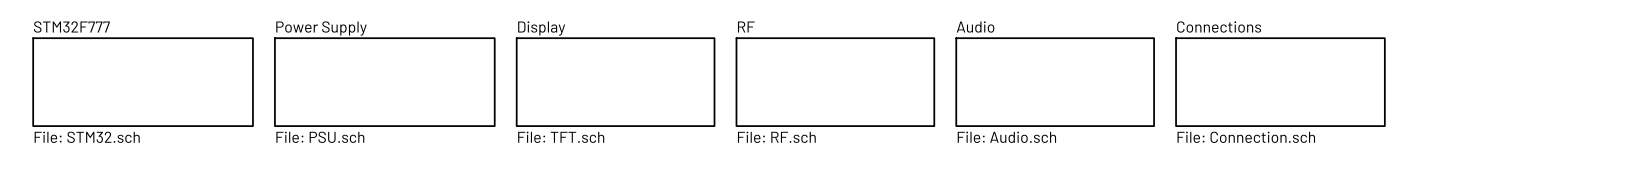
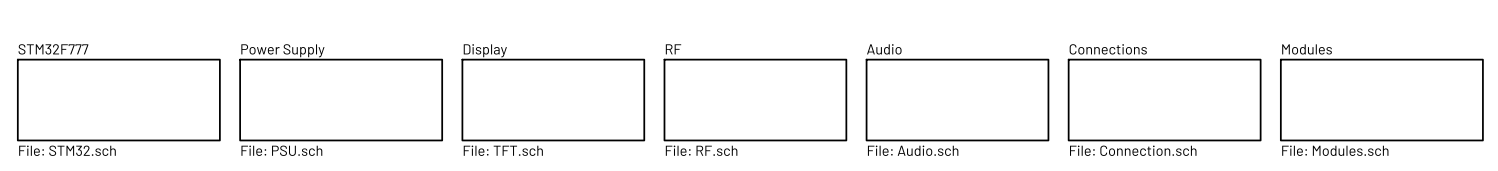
sheet Modules: none -> File: Modules.sch (1381, 100)

